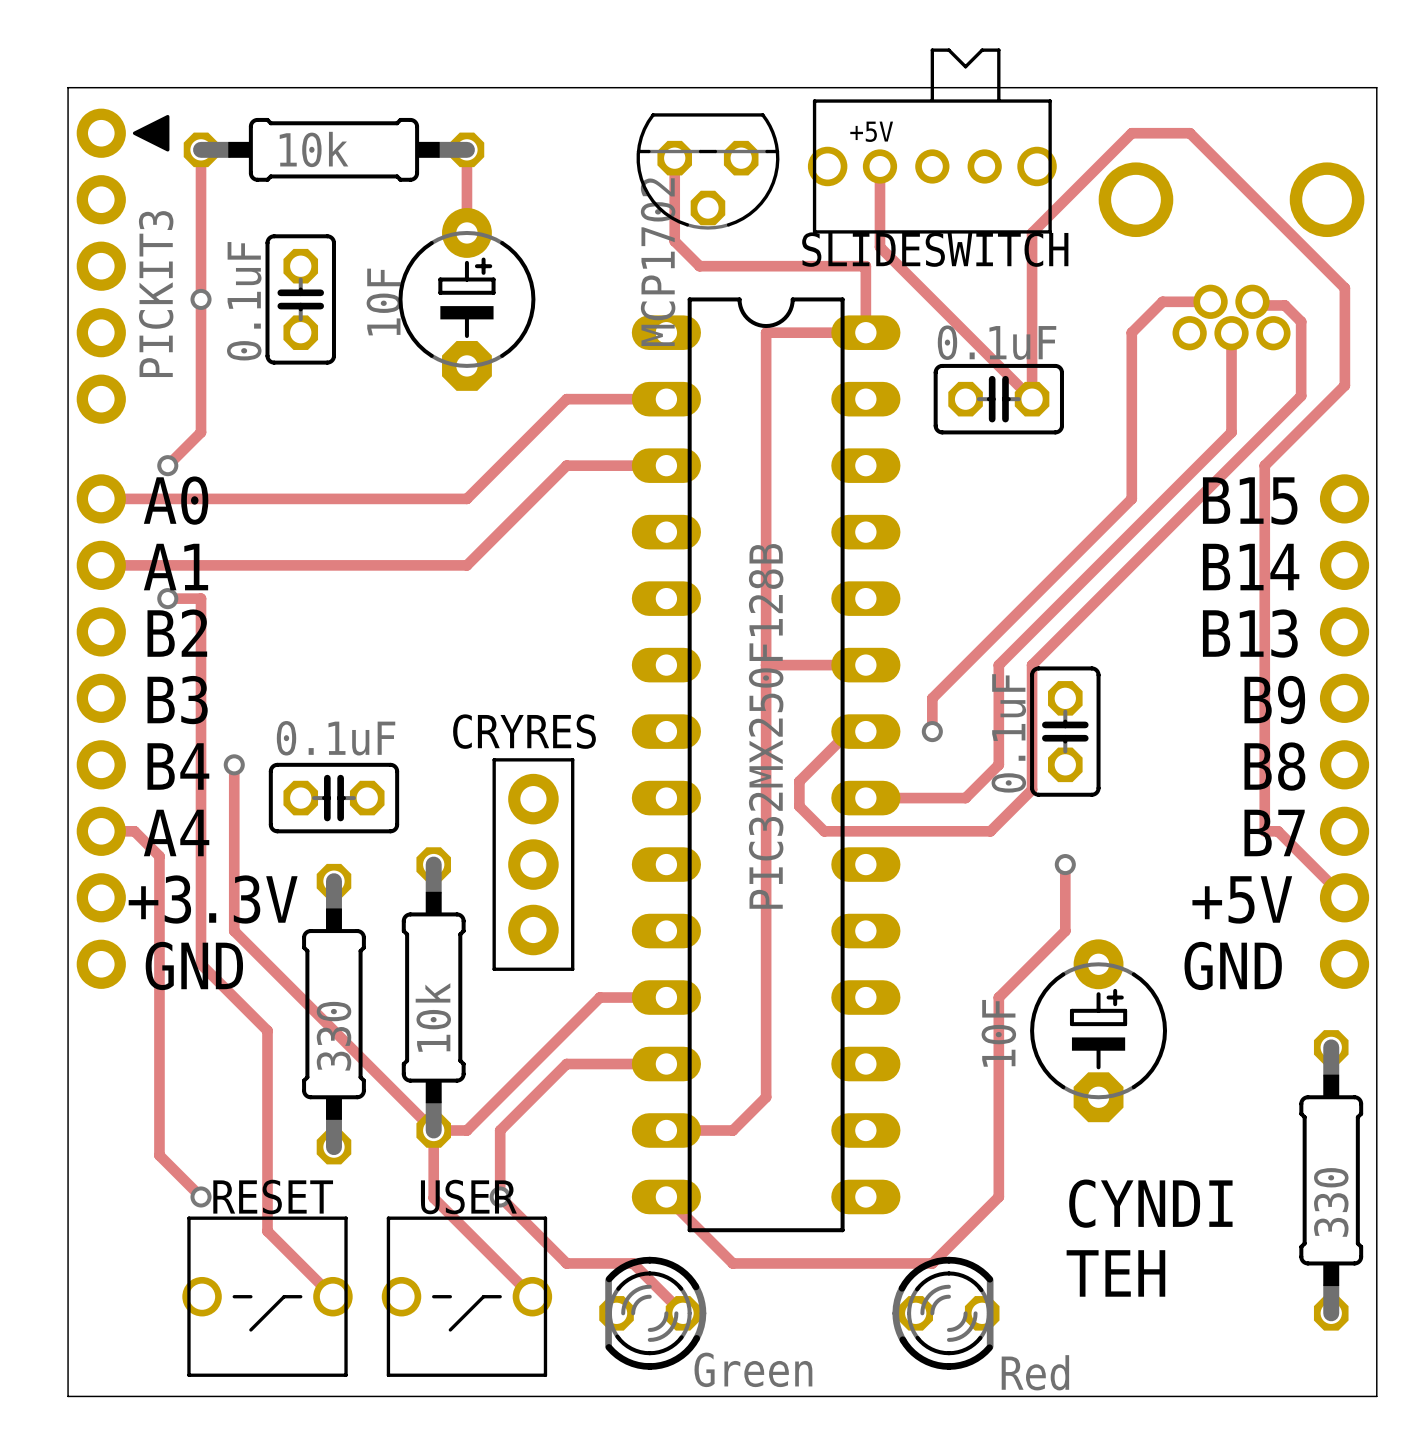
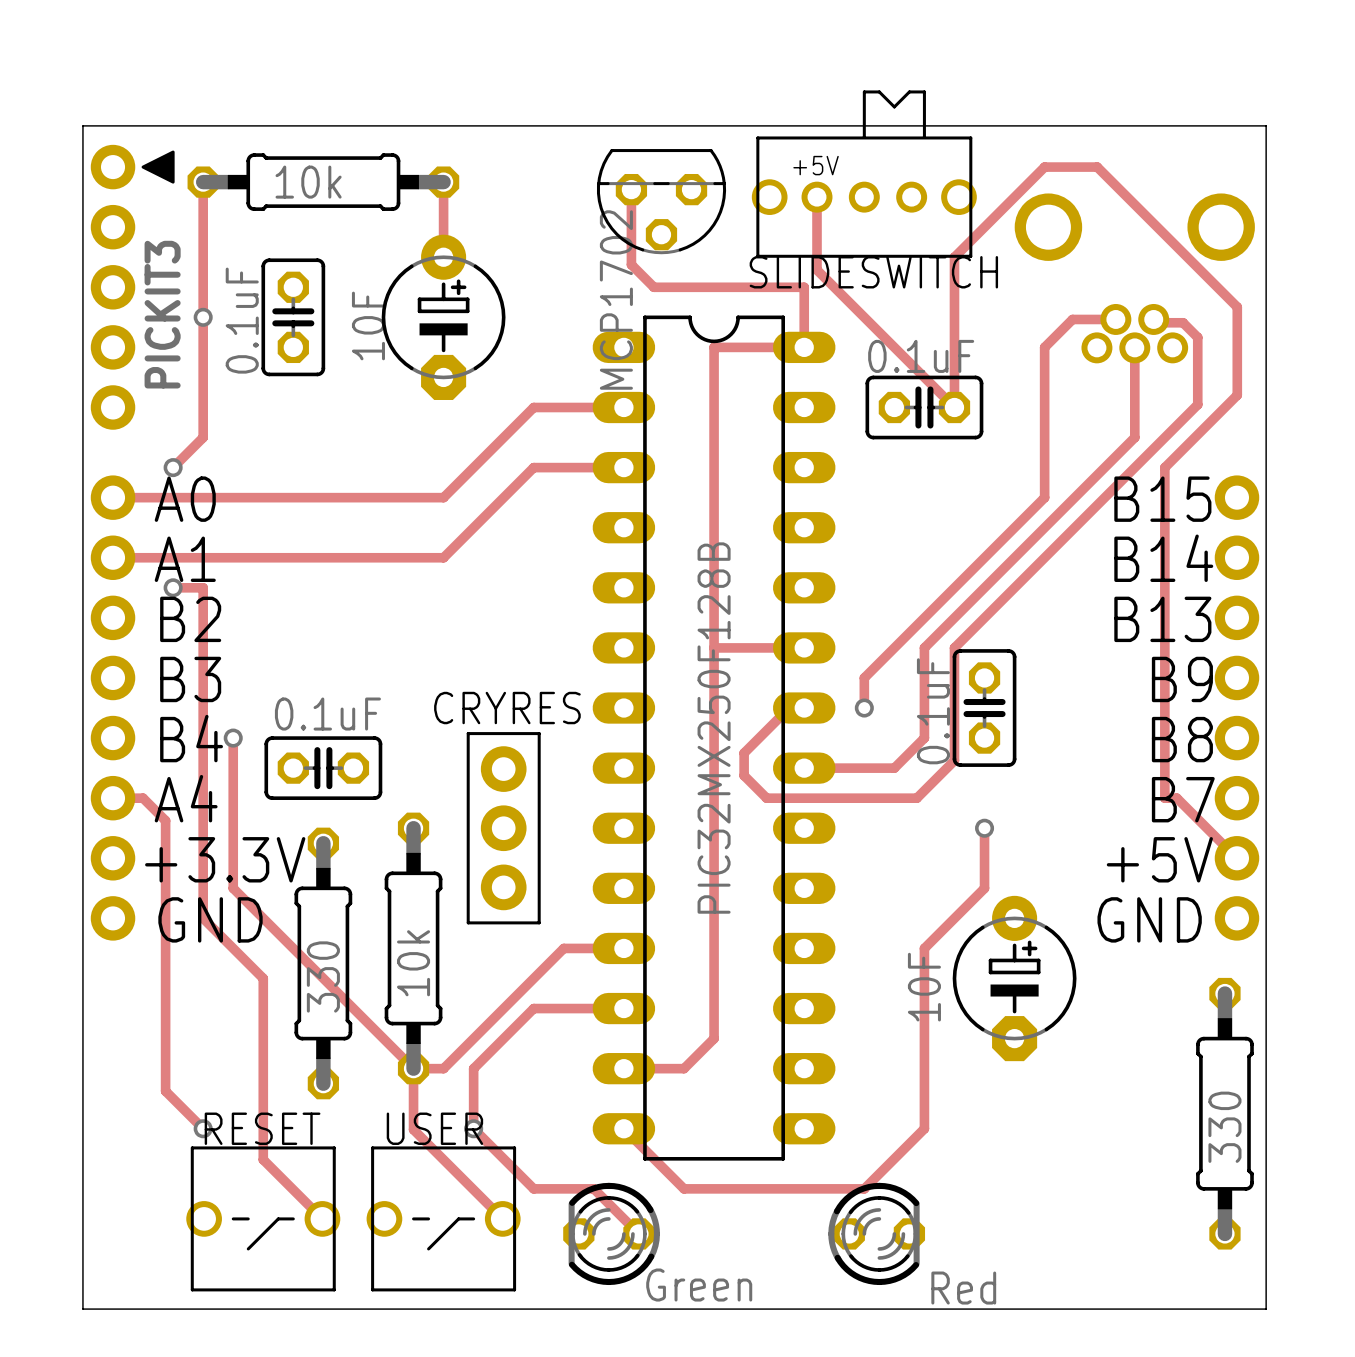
text: CYNDI (1150, 1203) -> none
text: TEH (1115, 1273) -> none

